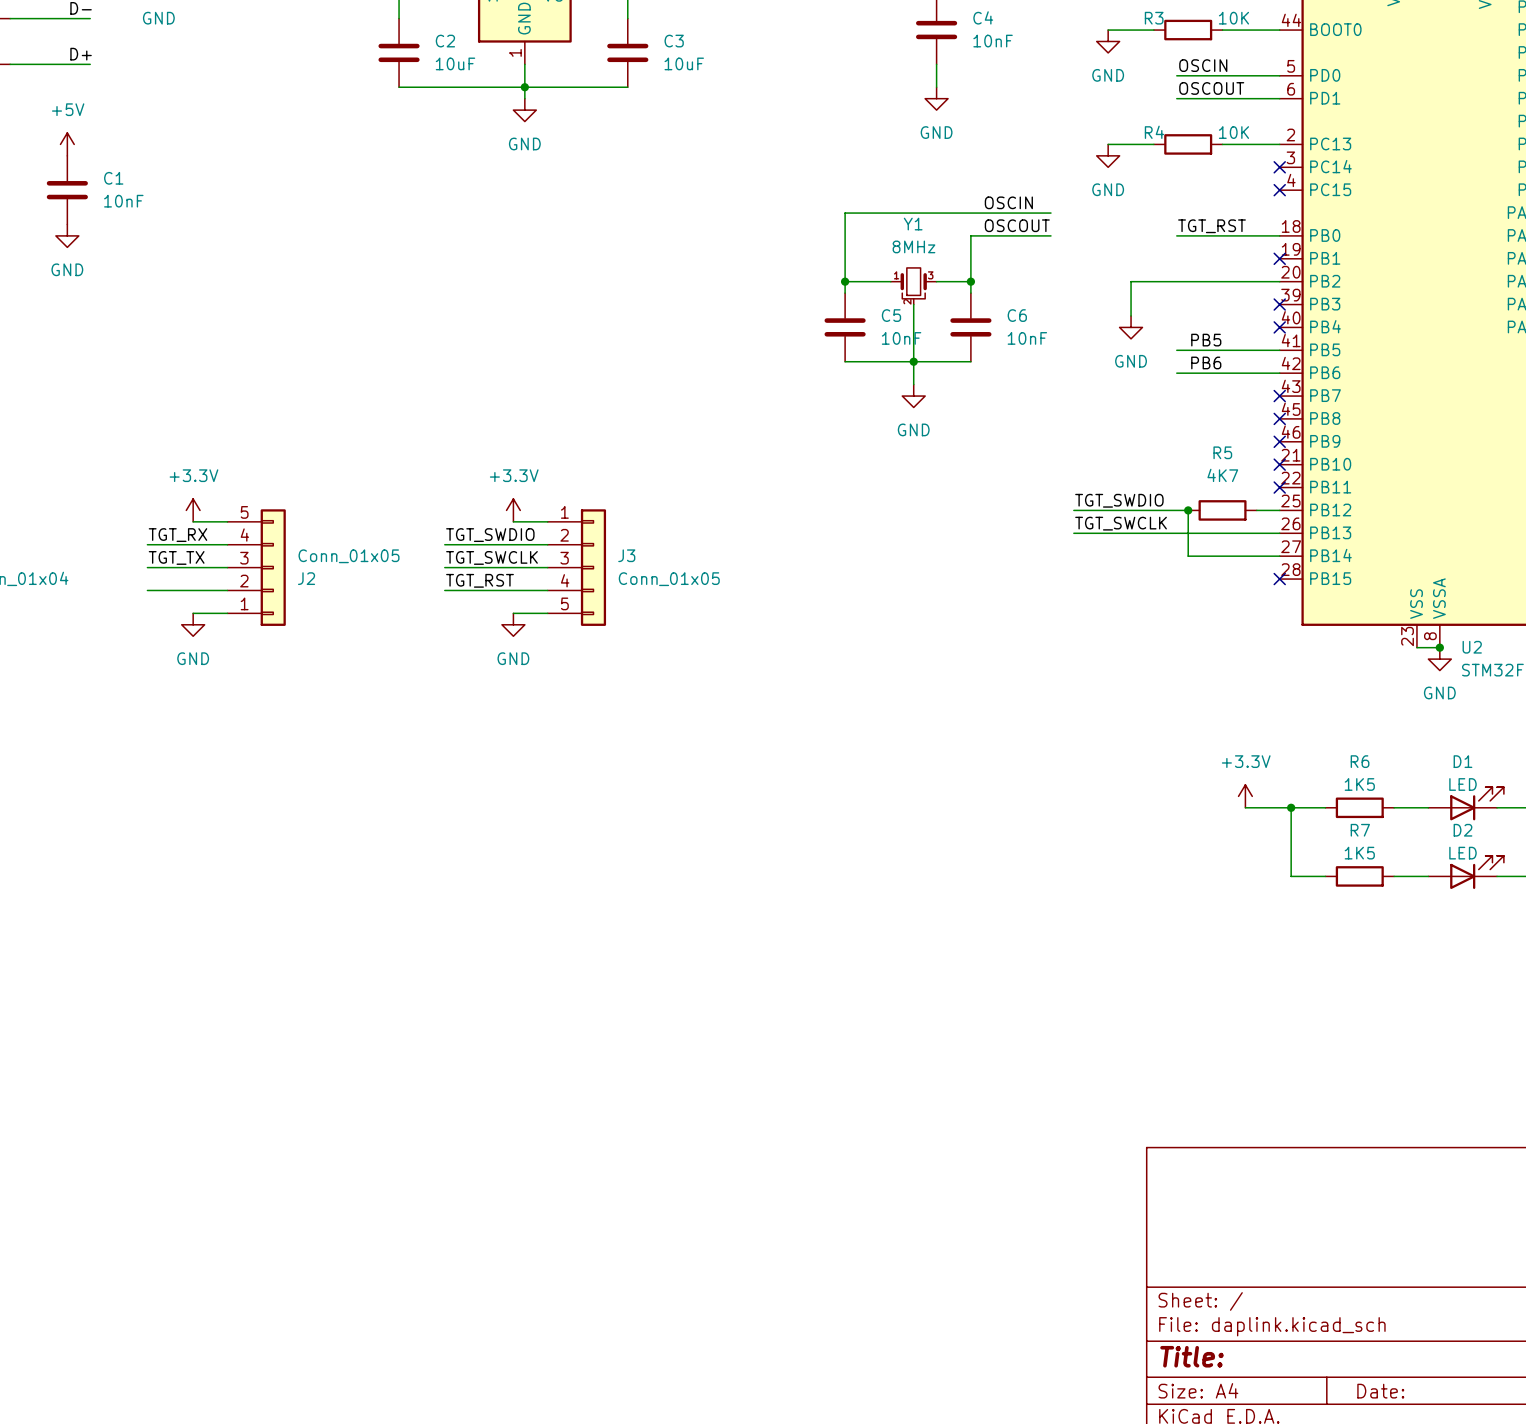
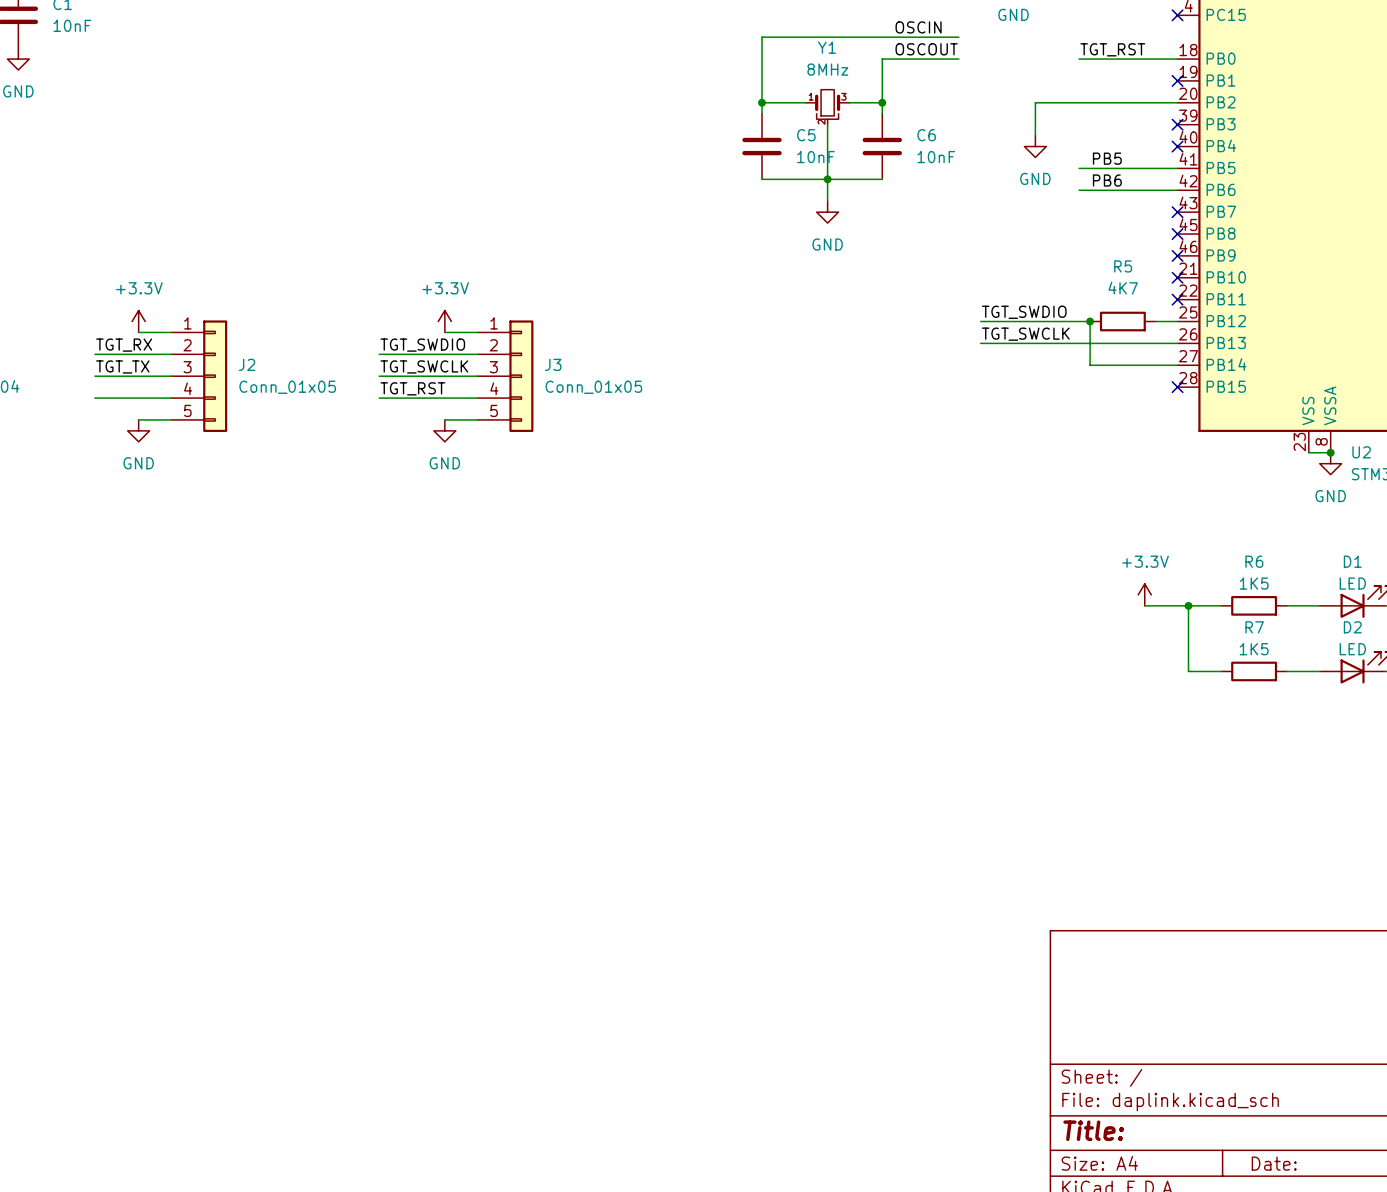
J2 flip: as is (273, 567) -> up-down (215, 376)

